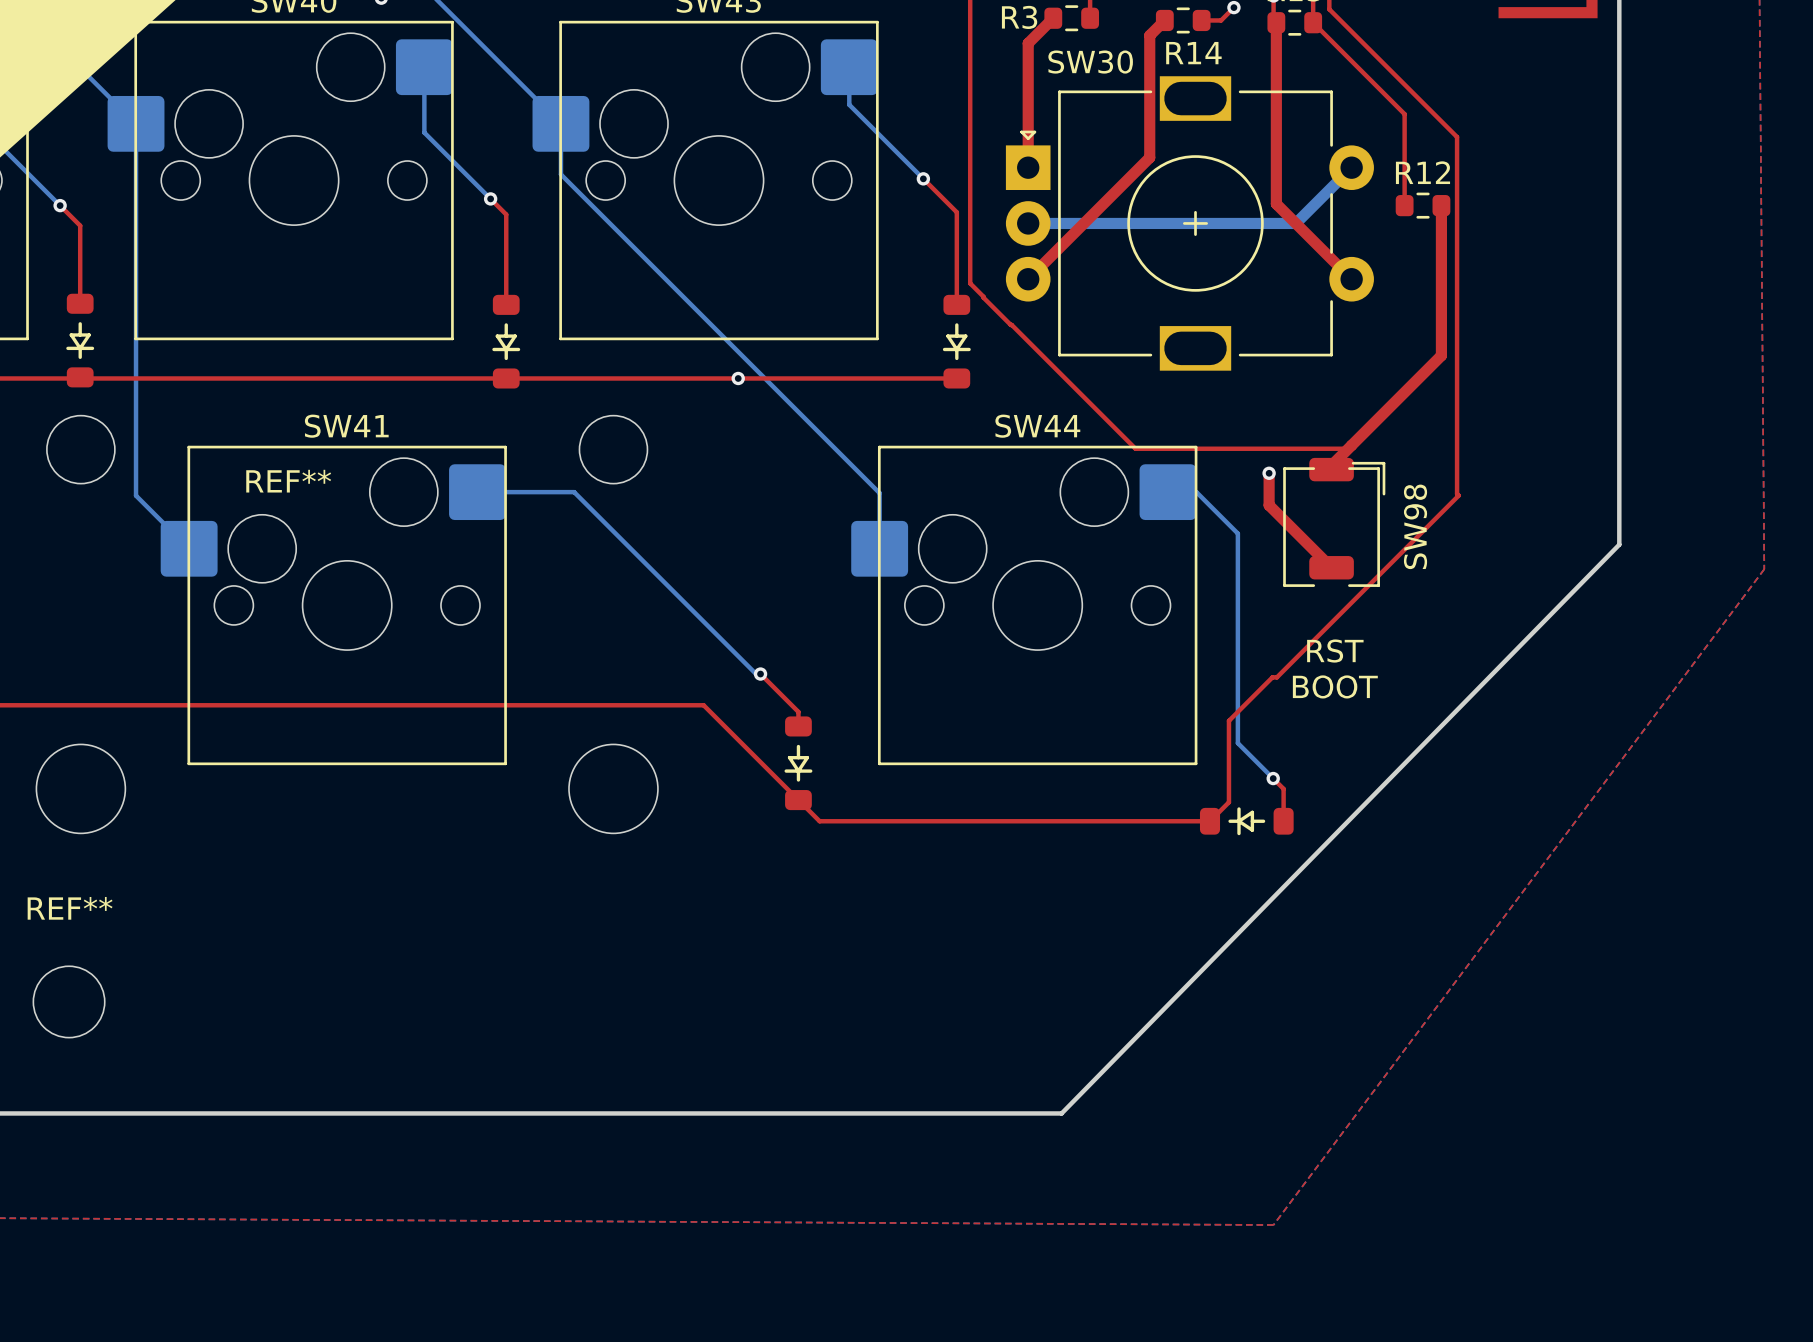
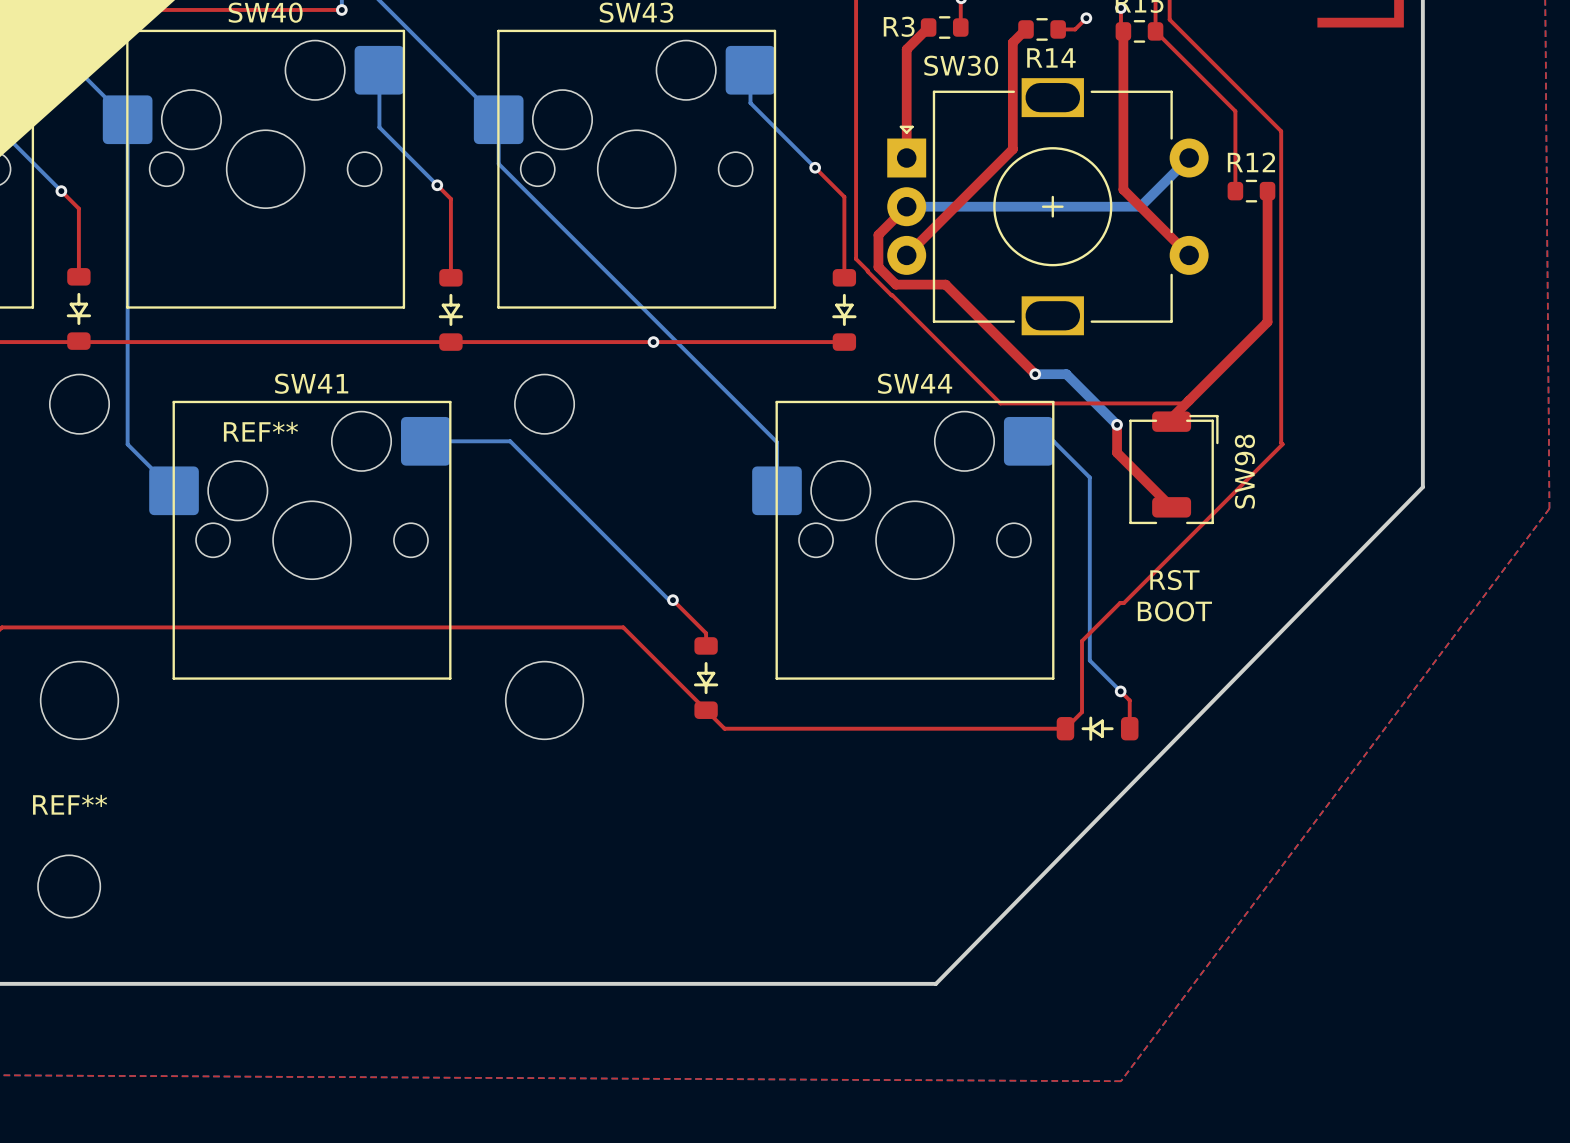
top track: none -> (906, 206) (878, 234) (878, 267) (895, 284) (945, 284) (1035, 374)
bottom track: none -> (1035, 374) (1066, 374) (1117, 424)
via: none -> (1035, 374)

